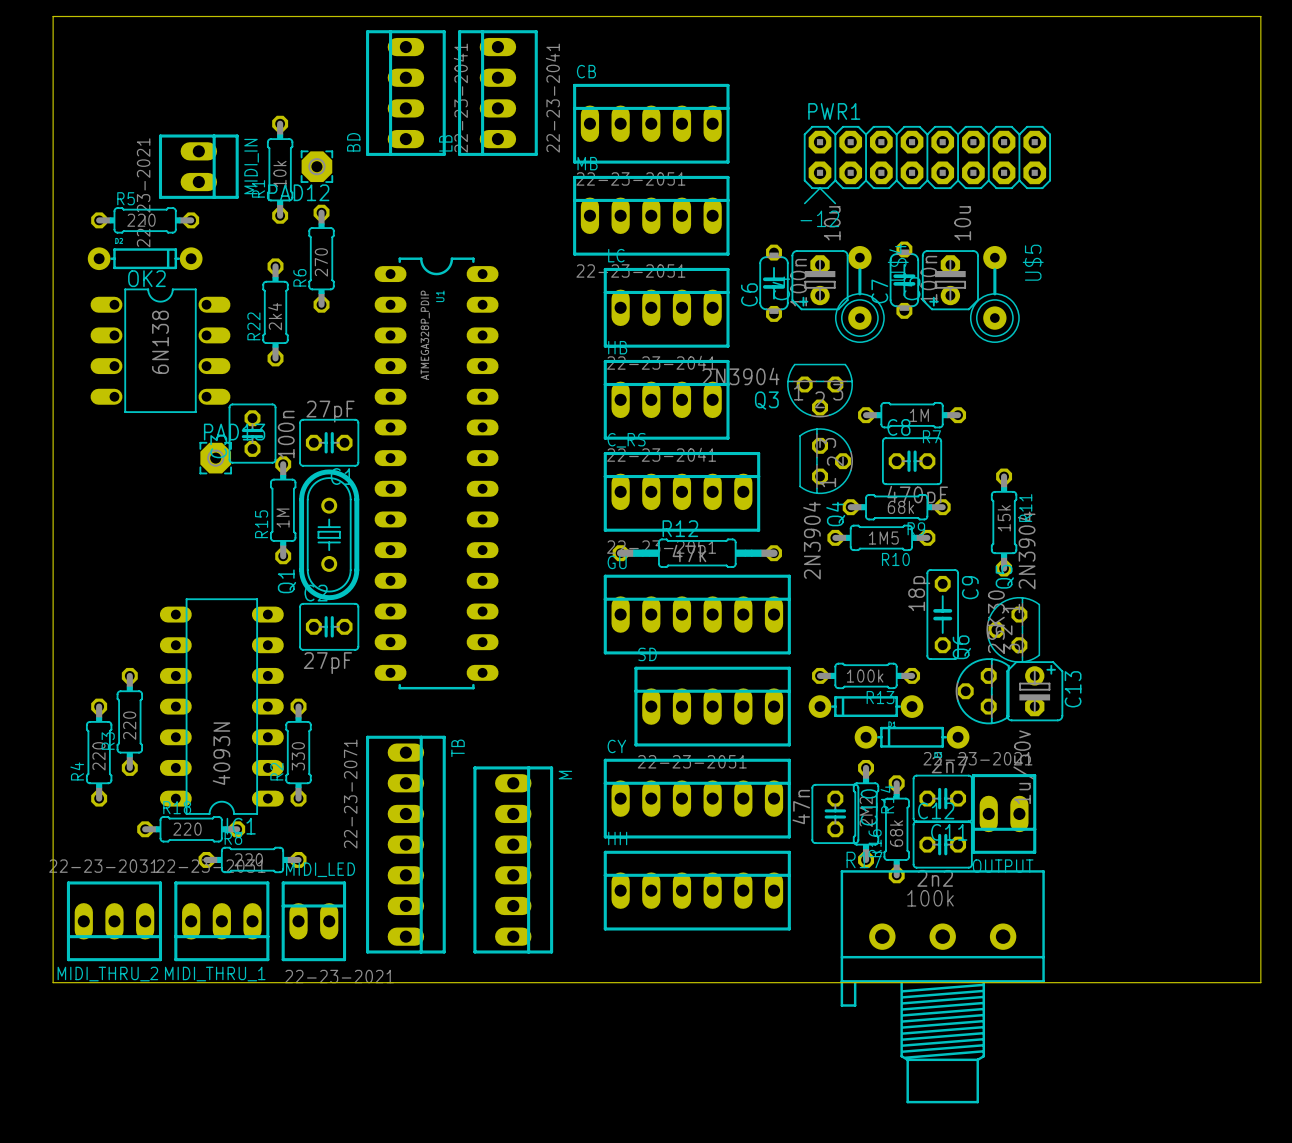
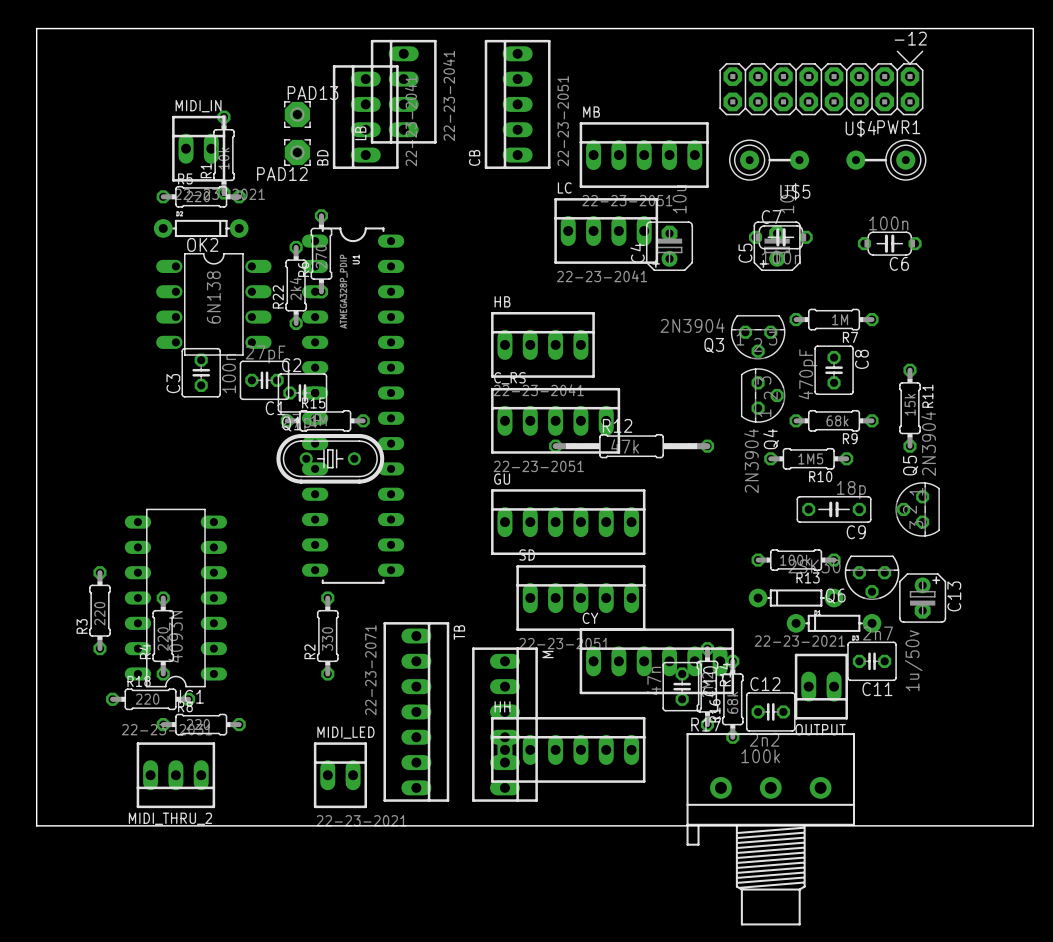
BD position: (405, 93) -> (365, 117)
PWR1 name position: PWR1 (834, 111) -> PWR1 (898, 127)
CB rotation: 0° (651, 123) -> 90° counterclockwise (517, 104)
PWR1 footprint: [803, 125, 1052, 205] -> [719, 50, 924, 116]
MIDI_IN rotation: 0° (198, 166) -> 90° counterclockwise (198, 148)
MIDI_IN position: (198, 166) -> (198, 148)
PAD12 position: (316, 166) -> (297, 152)
MB position: (651, 215) -> (644, 155)
R5 position: (145, 220) -> (201, 196)
part position: (145, 258) -> (201, 228)
R6 position: (321, 258) -> (321, 253)
C7 rotation: 0° (904, 280) -> 90° clockwise (780, 237)
C7 position: (904, 280) -> (780, 237)
C6 rotation: 0° (774, 283) -> 90° counterclockwise (889, 243)
C6 position: (774, 283) -> (889, 243)
U$4 rotation: 0° (859, 294) -> 90° counterclockwise (886, 160)
U$4 position: (859, 294) -> (886, 160)
U$5 rotation: 0° (994, 294) -> 90° clockwise (769, 160)
U$5 position: (994, 294) -> (769, 160)
LC position: (666, 307) -> (606, 230)
R22 position: (275, 312) -> (296, 285)
OK2 position: (160, 350) -> (213, 304)
Q3 position: (820, 390) -> (758, 337)
R7 position: (912, 415) -> (834, 319)
PAD13 position: (215, 458) -> (297, 114)
Q4 position: (826, 461) -> (763, 395)
C8 rotation: 0° (912, 461) -> 90° clockwise (834, 370)
C8 position: (912, 461) -> (834, 370)
R9 position: (896, 507) -> (834, 420)
R15 rotation: 0° (283, 510) -> 90° clockwise (325, 420)
R15 position: (283, 510) -> (325, 420)
R11 position: (1004, 522) -> (910, 408)
Q1 rotation: 0° (329, 534) -> 90° clockwise (330, 458)
Q1 position: (329, 534) -> (330, 458)
R10 position: (881, 537) -> (808, 458)
R12 footprint: [612, 538, 782, 568] -> [549, 434, 715, 459]
C9 rotation: 0° (942, 614) -> 90° clockwise (834, 509)
C9 position: (942, 614) -> (834, 509)
C2 position: (329, 626) -> (302, 392)
Q5 position: (1013, 629) -> (917, 509)
R13 position: (866, 675) -> (796, 560)
Q6 rotation: 0° (982, 691) -> 90° counterclockwise (872, 577)
Q6 position: (982, 691) -> (872, 577)
C13 position: (1034, 691) -> (922, 598)
part position: (866, 706) -> (796, 598)
part position: (912, 737) -> (834, 623)
R4 position: (99, 752) -> (163, 636)
R2 position: (298, 752) -> (327, 636)
CY position: (697, 798) -> (656, 661)
C11 position: (942, 798) -> (872, 661)
TB position: (405, 844) -> (416, 711)
M position: (513, 859) -> (504, 724)
MIDI_THRU_2: 22-23-2031 (114, 921) -> none
MIDI_LED position: (313, 921) -> (340, 775)
MIDI_THRU_1 name: MIDI_THRU_1 (215, 974) -> MIDI_THRU_2 (170, 818)

